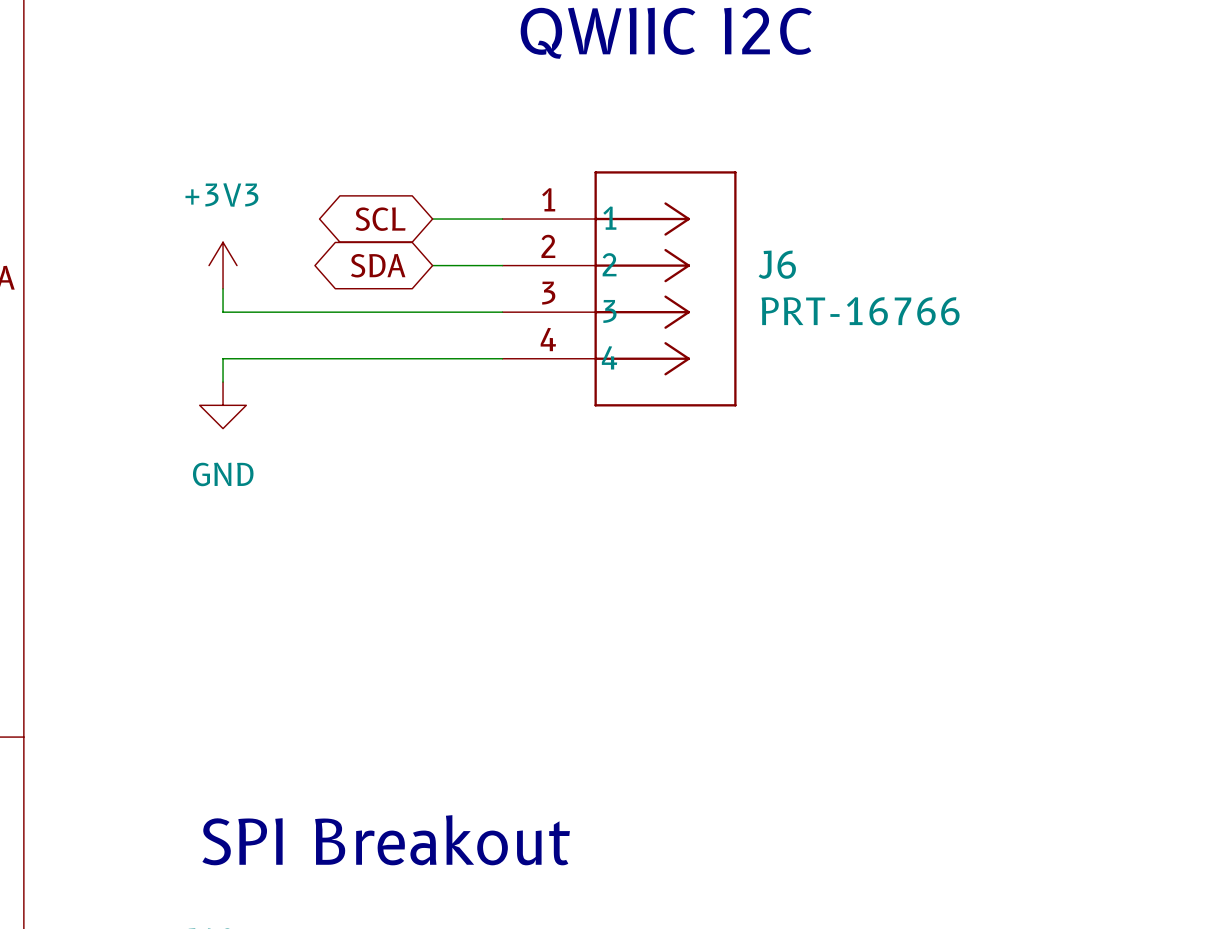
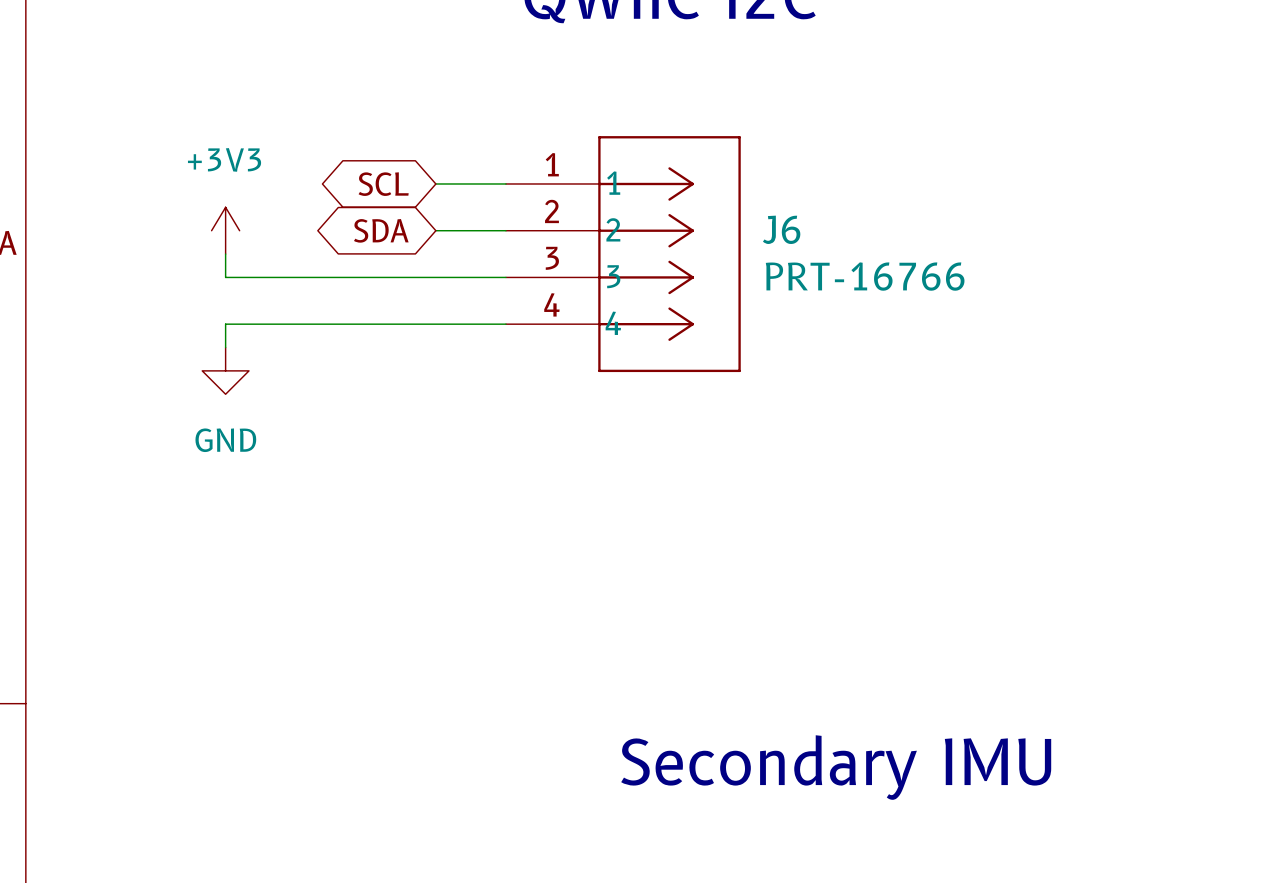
text: none -> Secondary IMU (836, 767)
text: SPI Breakout (386, 840) -> none

